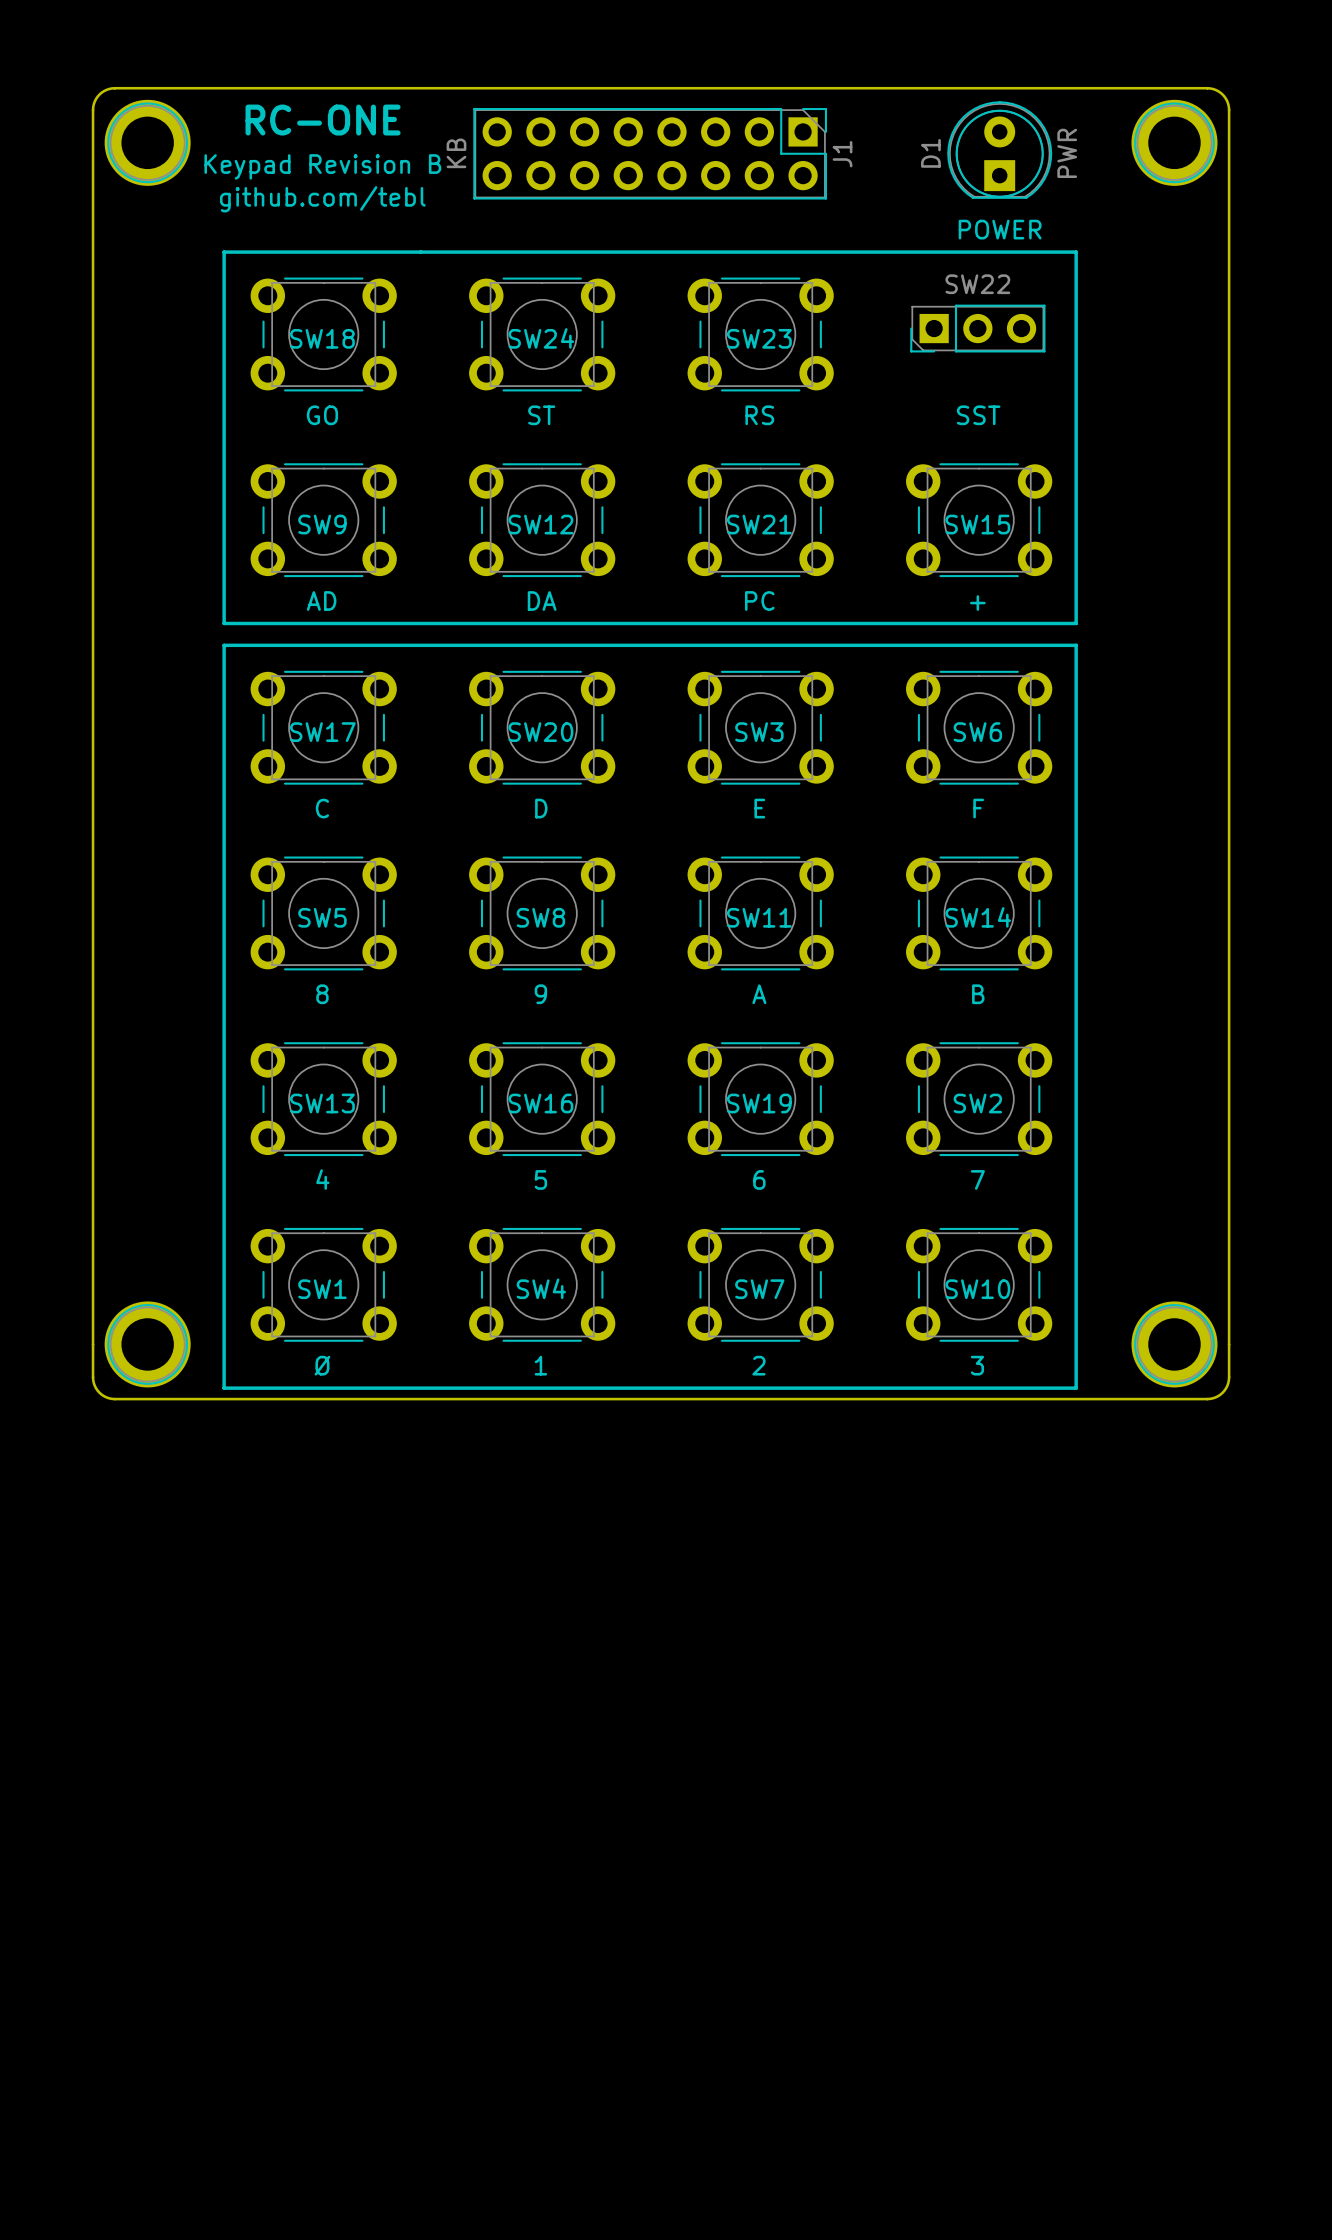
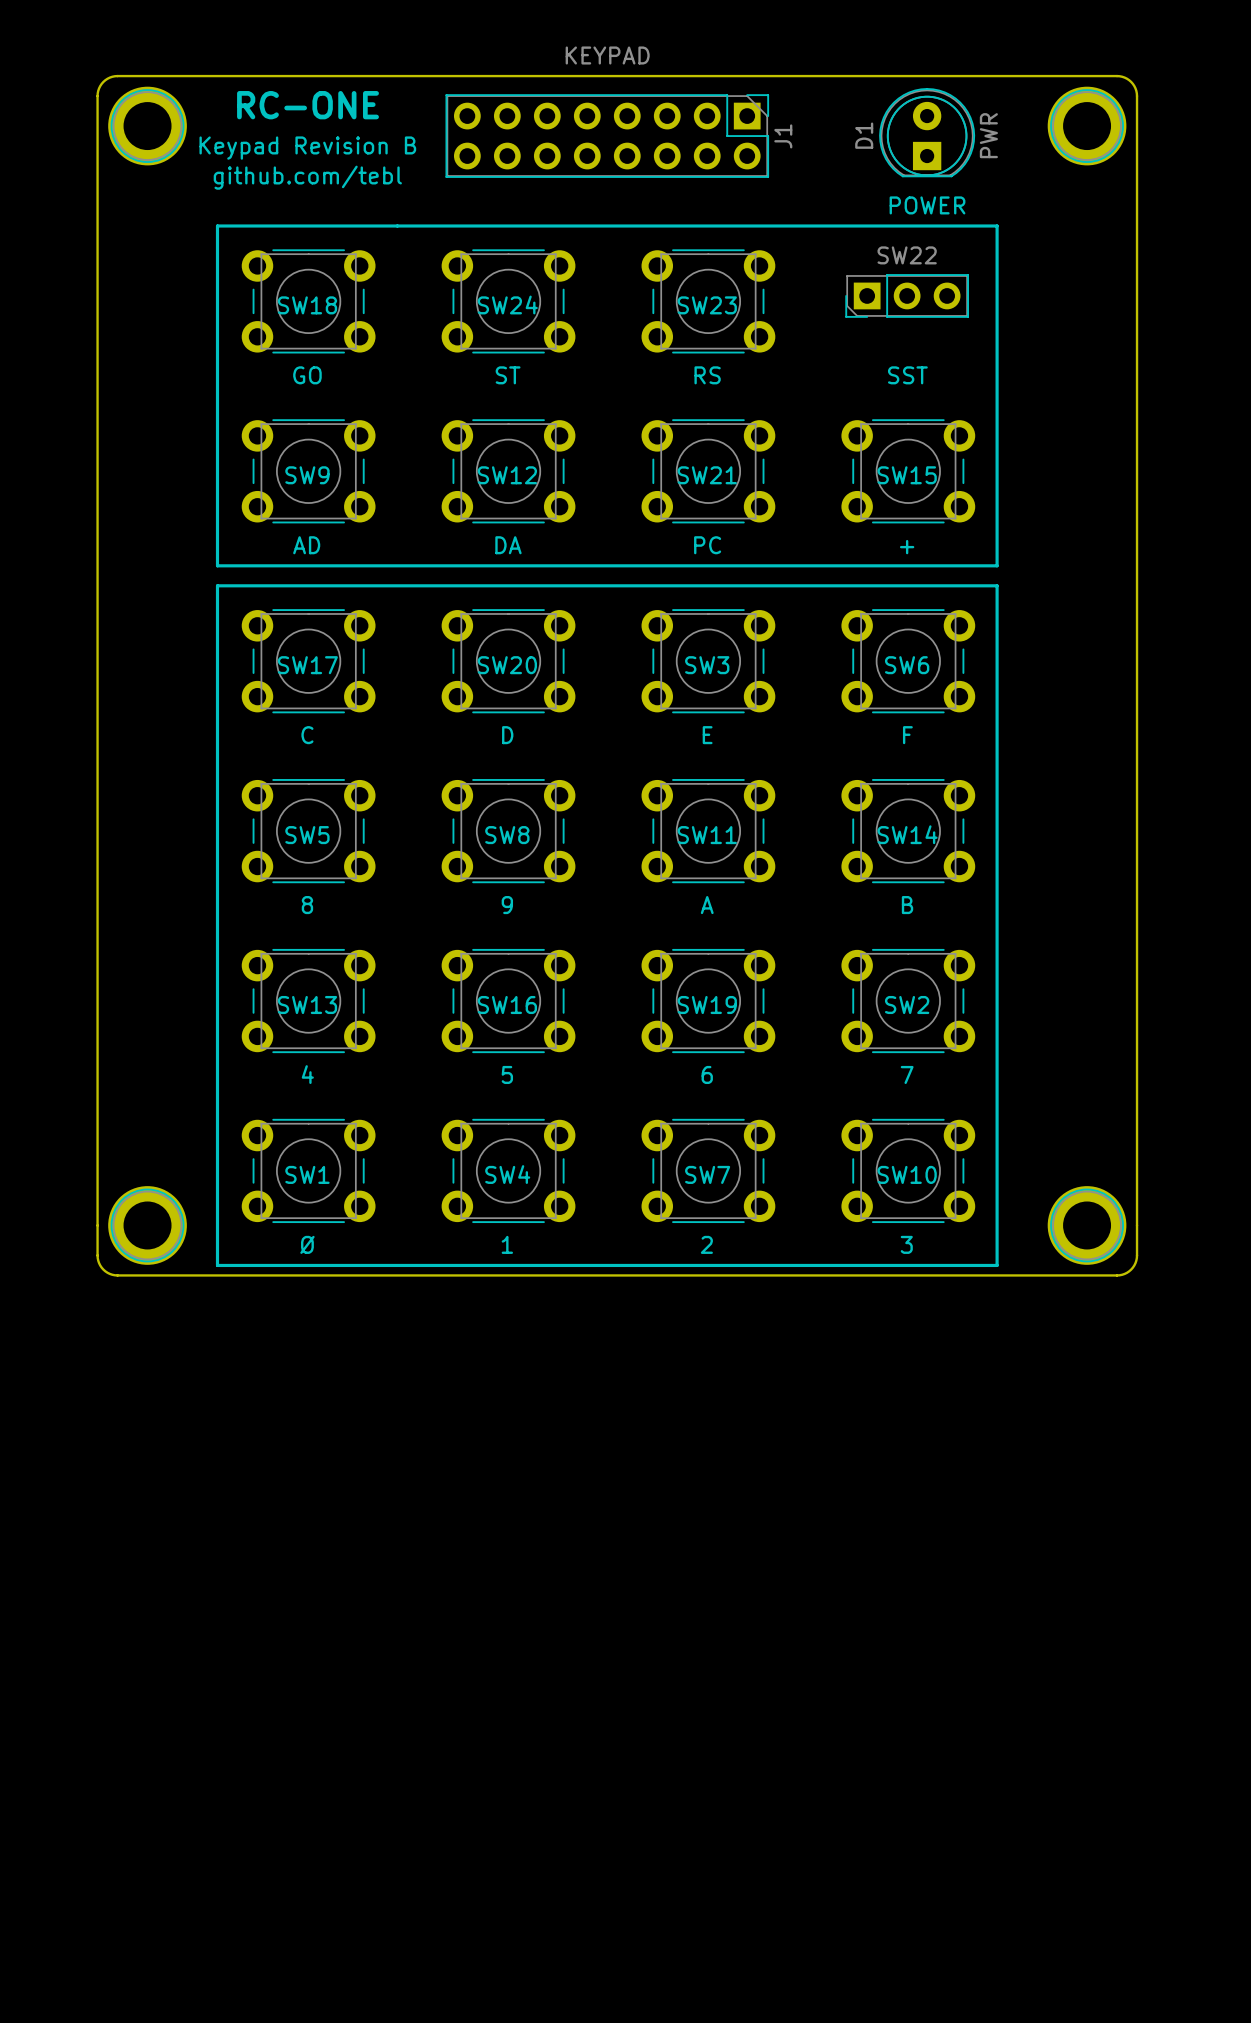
J1 value: KB (456, 153) -> KEYPAD (607, 55)

